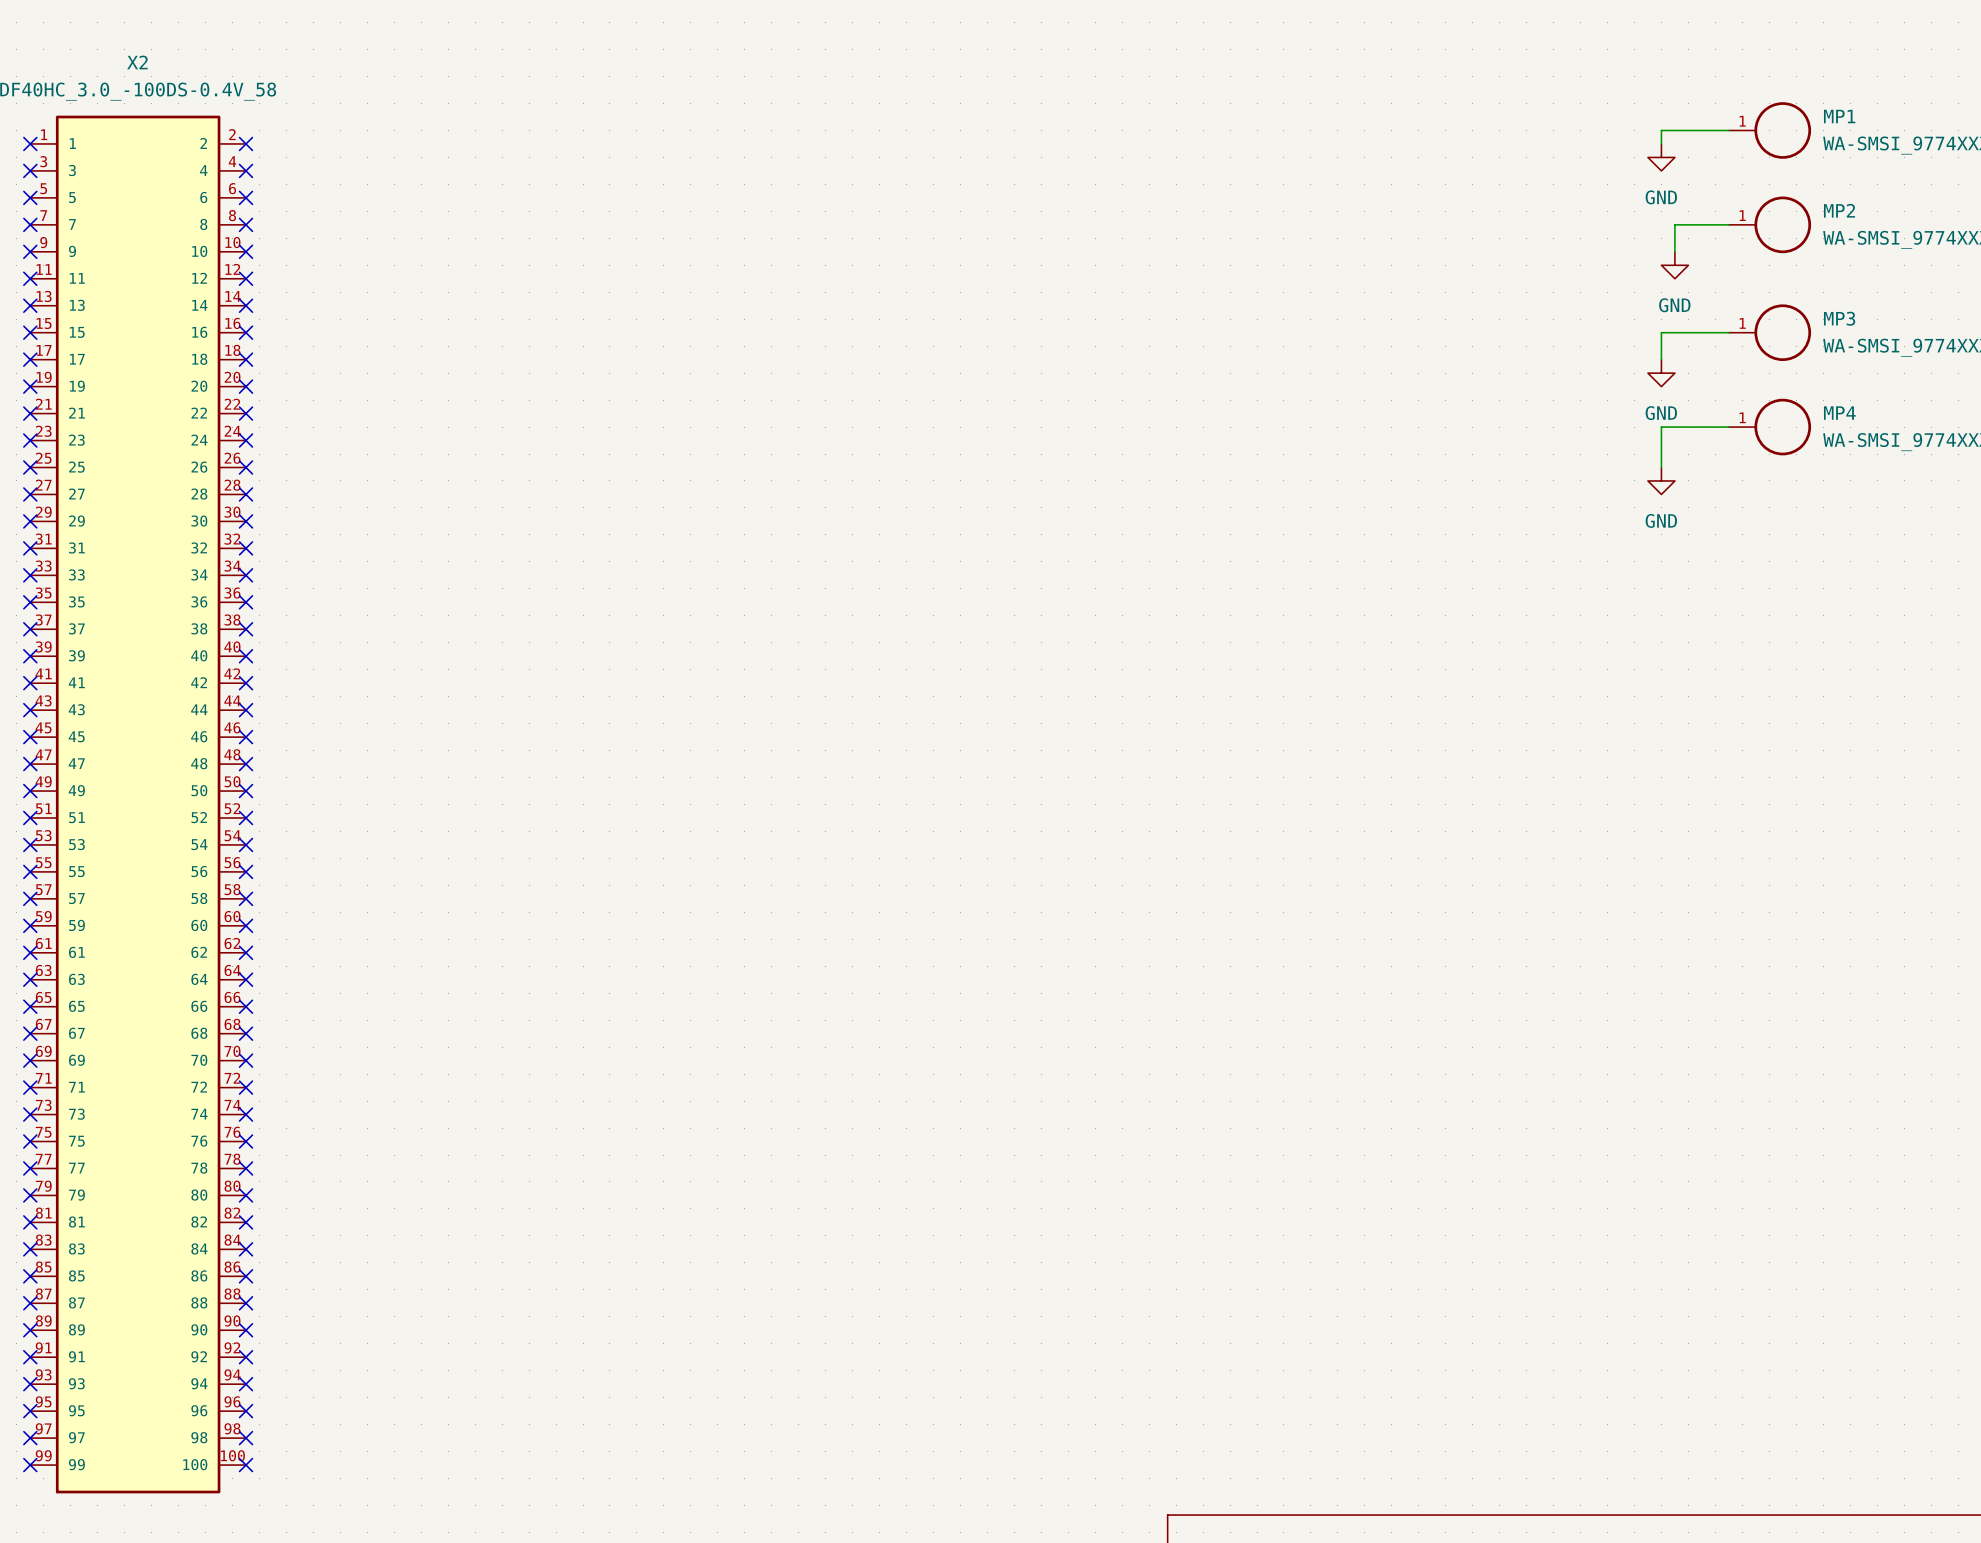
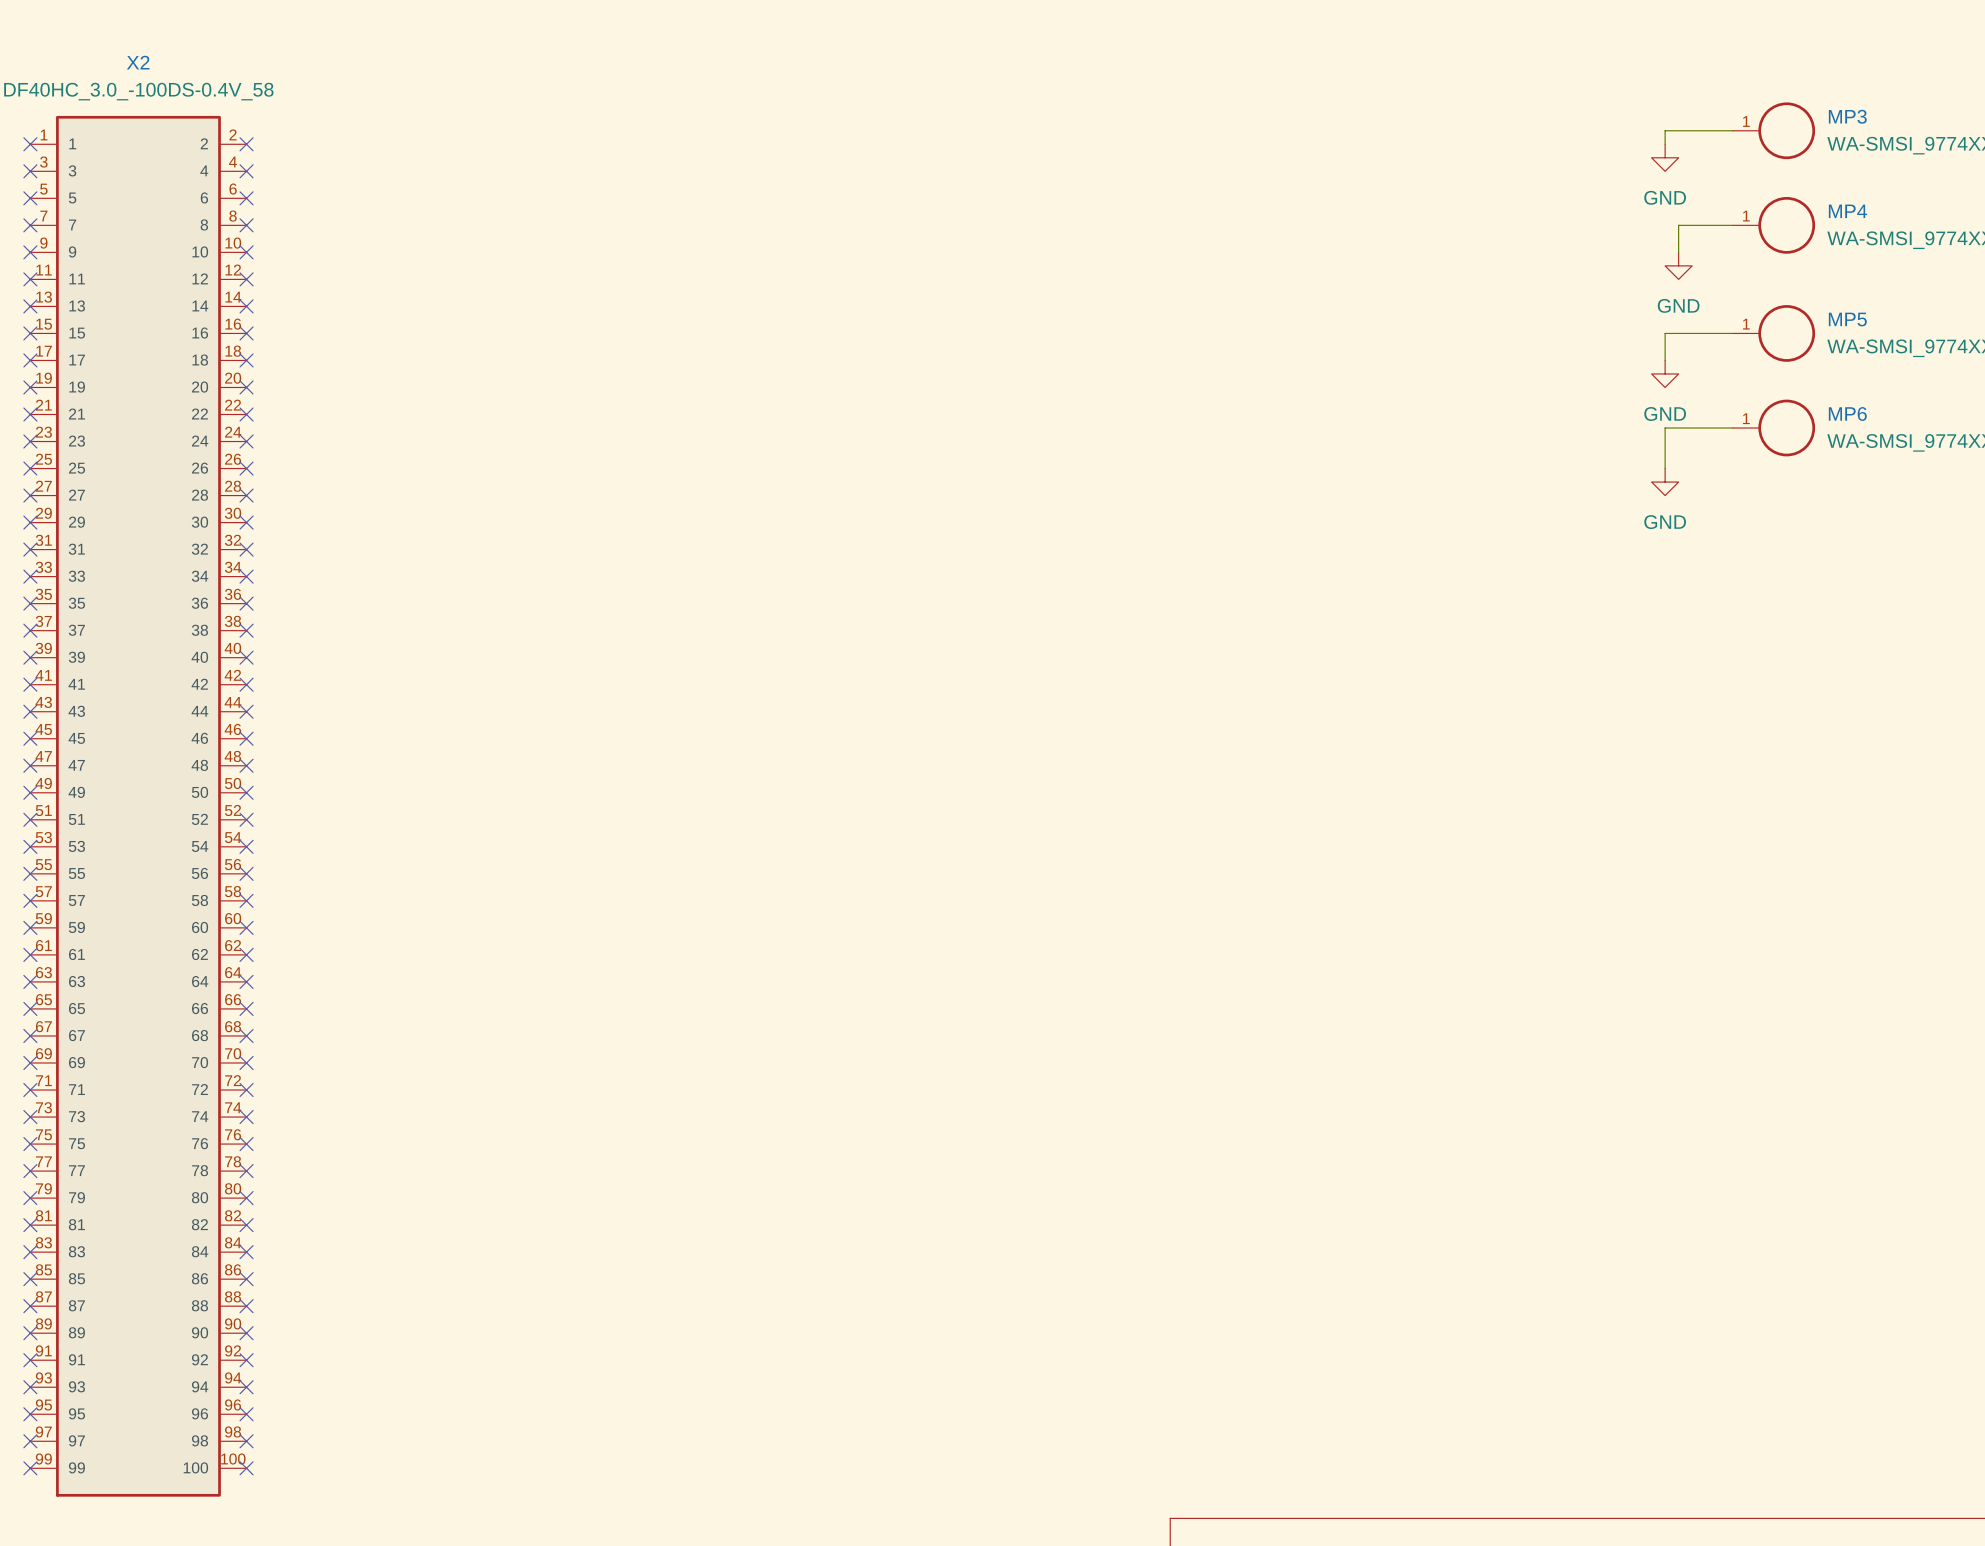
MP1 name: MP1 (1839, 116) -> MP3 (1847, 116)
MP2 name: MP2 (1839, 210) -> MP4 (1847, 211)
MP3 name: MP3 (1839, 318) -> MP5 (1847, 319)
MP4 name: MP4 (1839, 413) -> MP6 (1847, 413)

